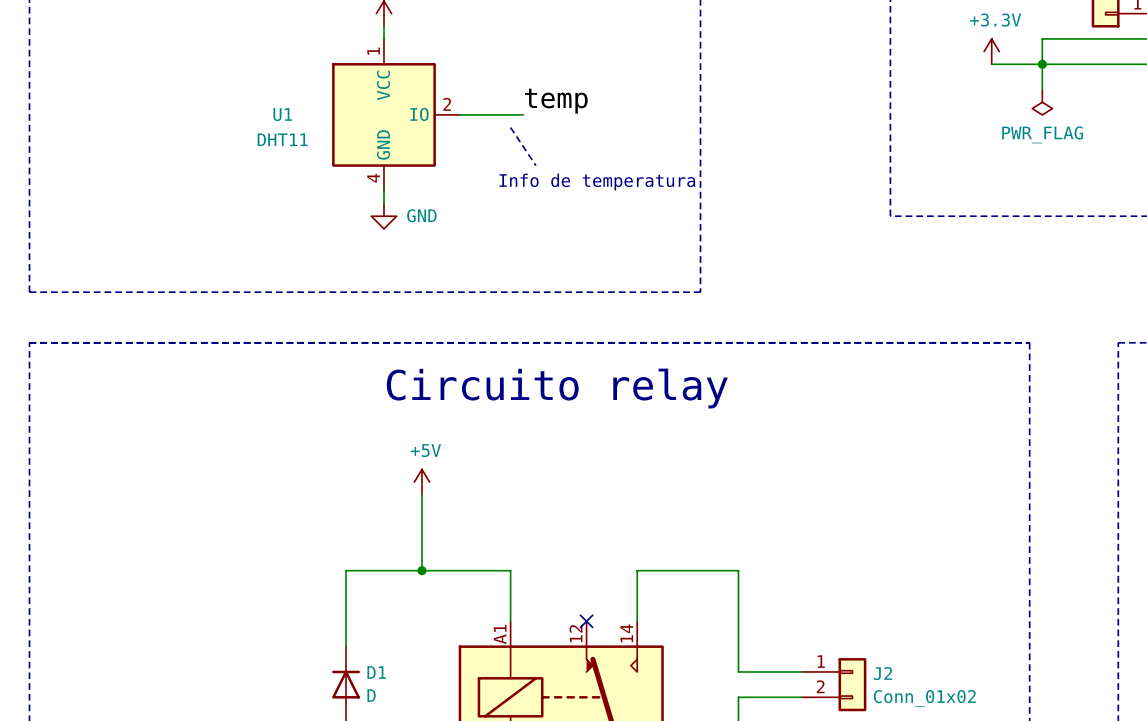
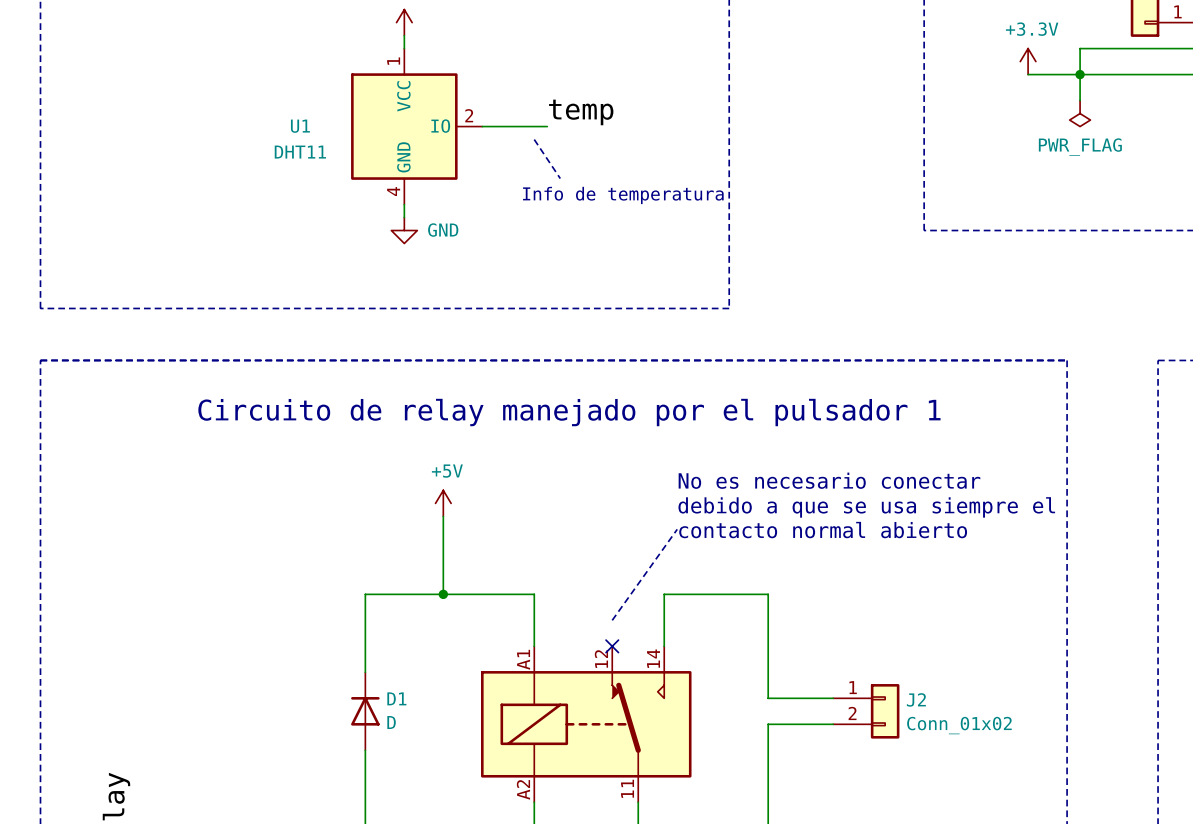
text: Circuito relay (557, 388) -> none
text: none -> Circuito de relay manejado por el pulsador 1 (569, 412)
text: none -> No es necesario conectar (829, 480)
text: none -> debido a que se usa siempre el (866, 507)
line: none -> (677, 529) (612, 620)
text: none -> contacto normal abierto (823, 530)

